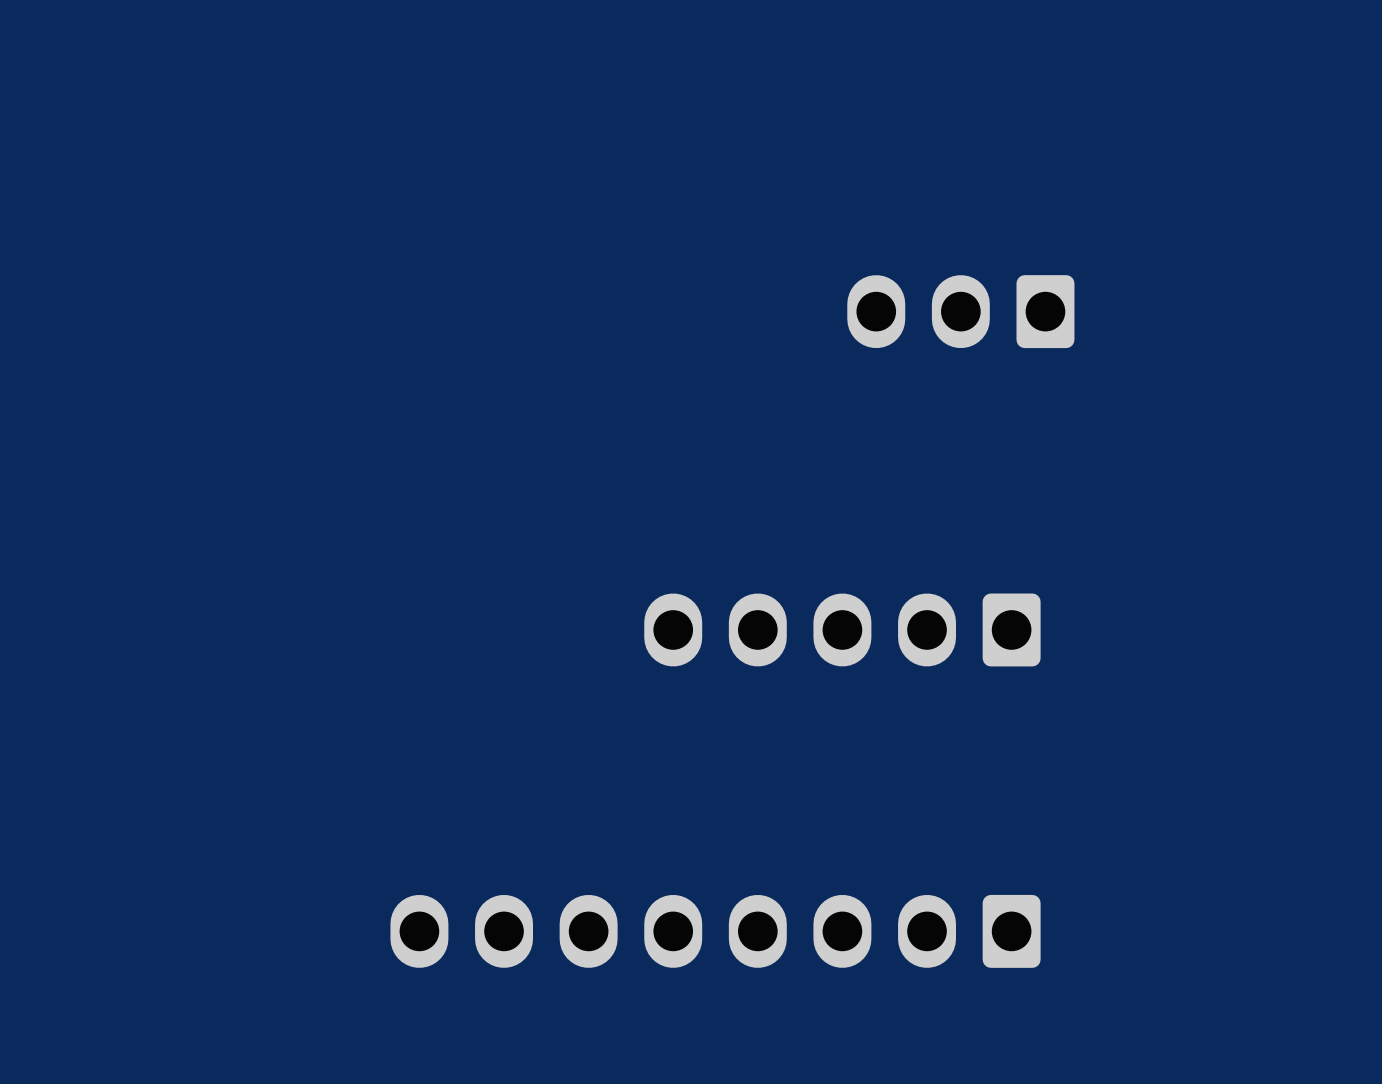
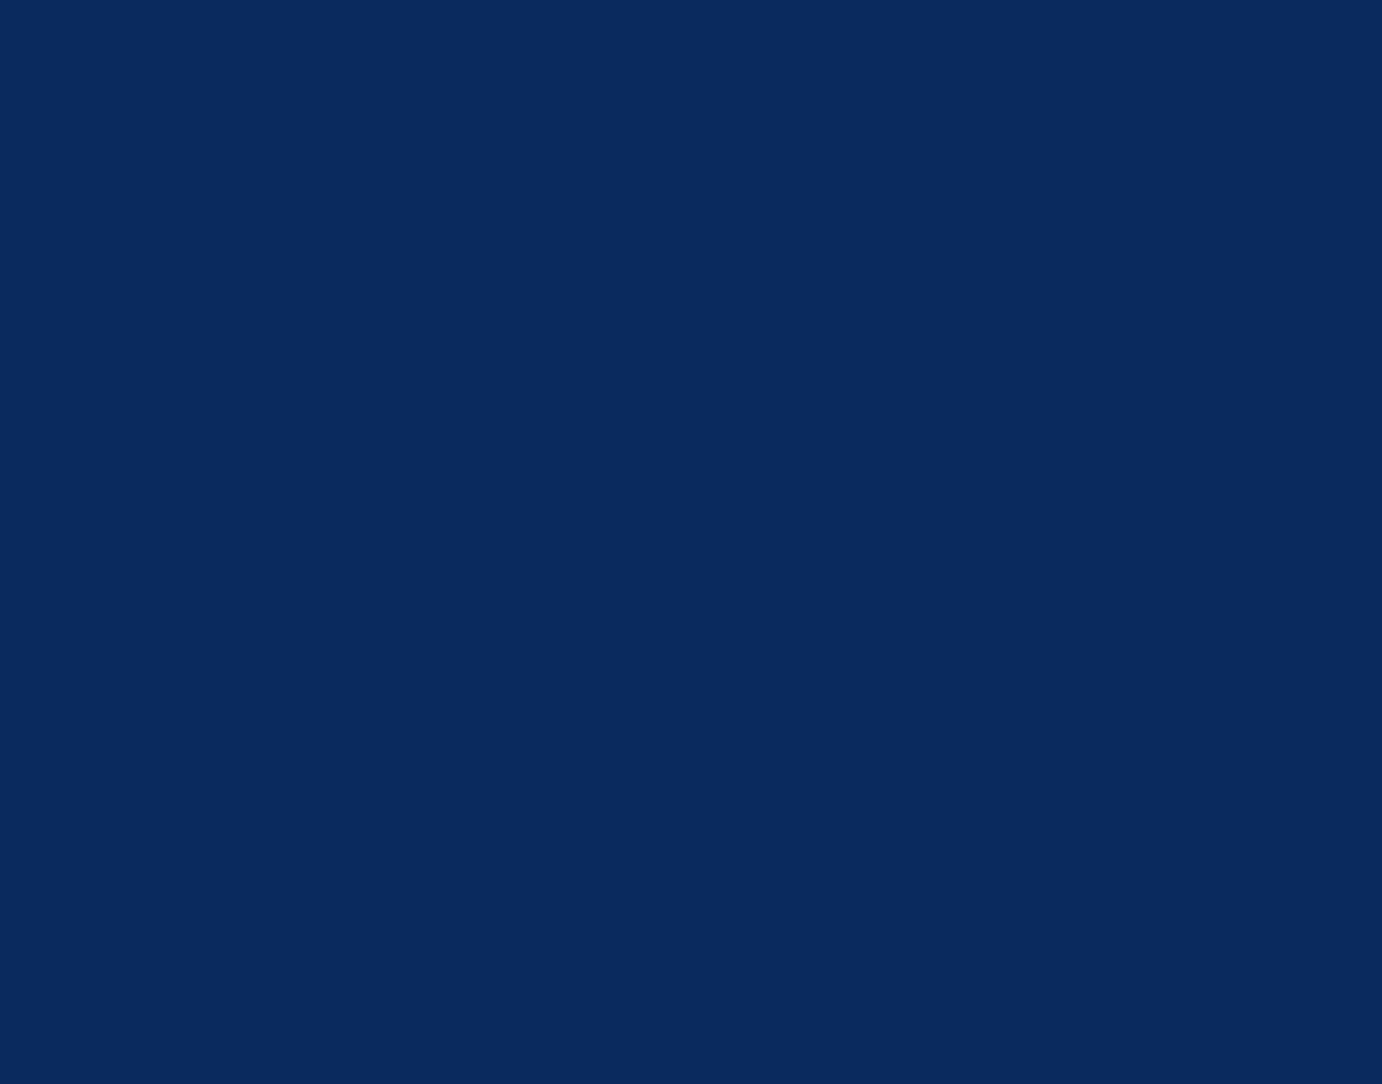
part: (960, 311) -> none
part: (842, 629) -> none
part: (715, 931) -> none

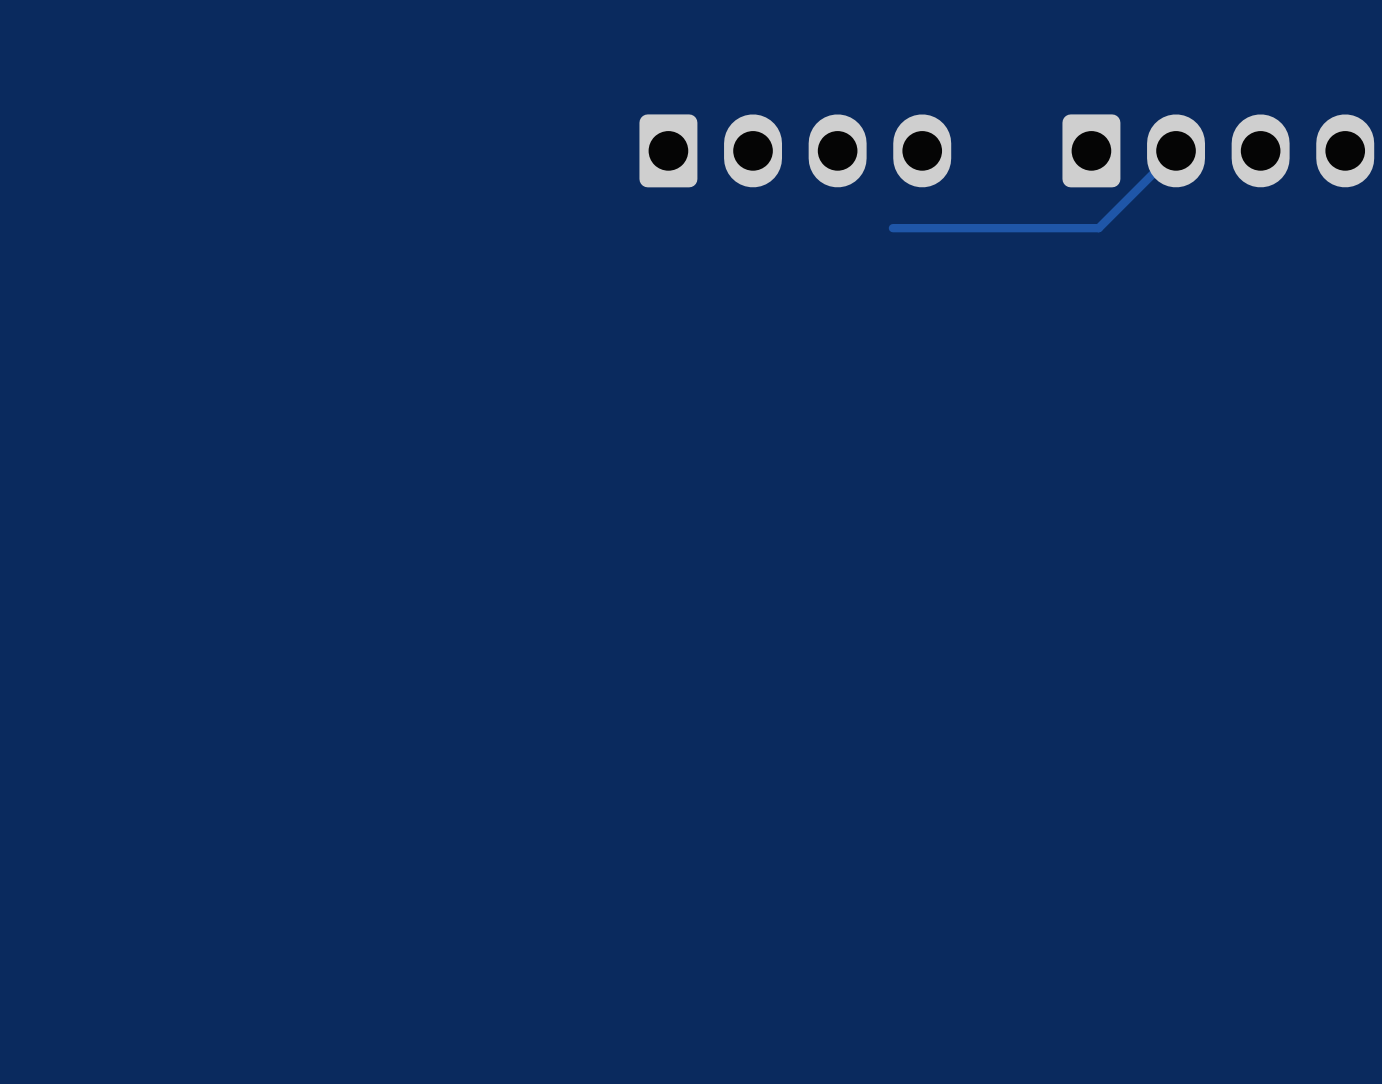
part: none -> (795, 150)
track: none -> (1176, 150) (1098, 228) (892, 228)
part: none -> (1218, 150)

